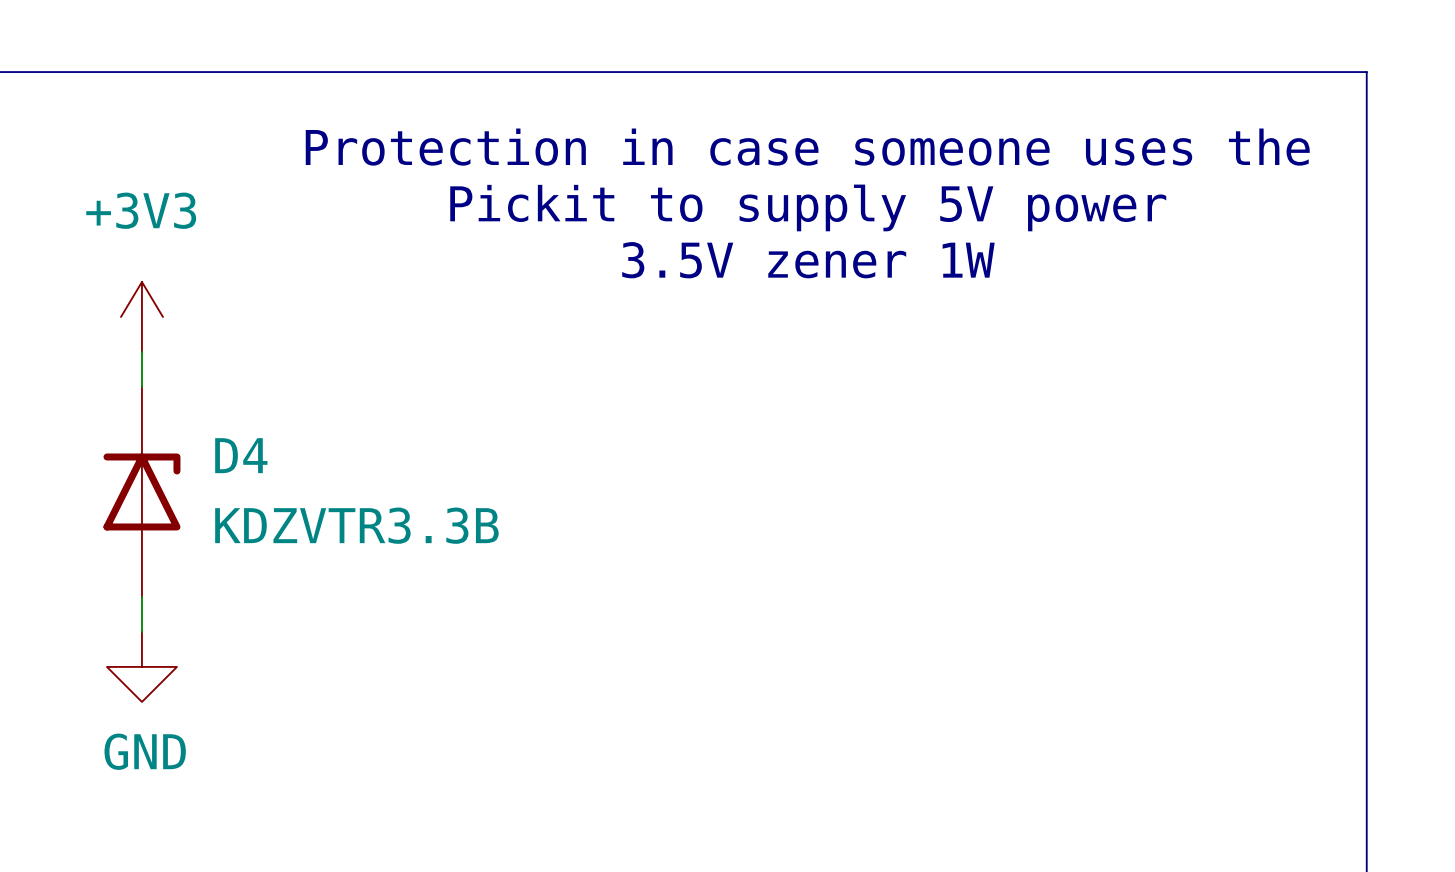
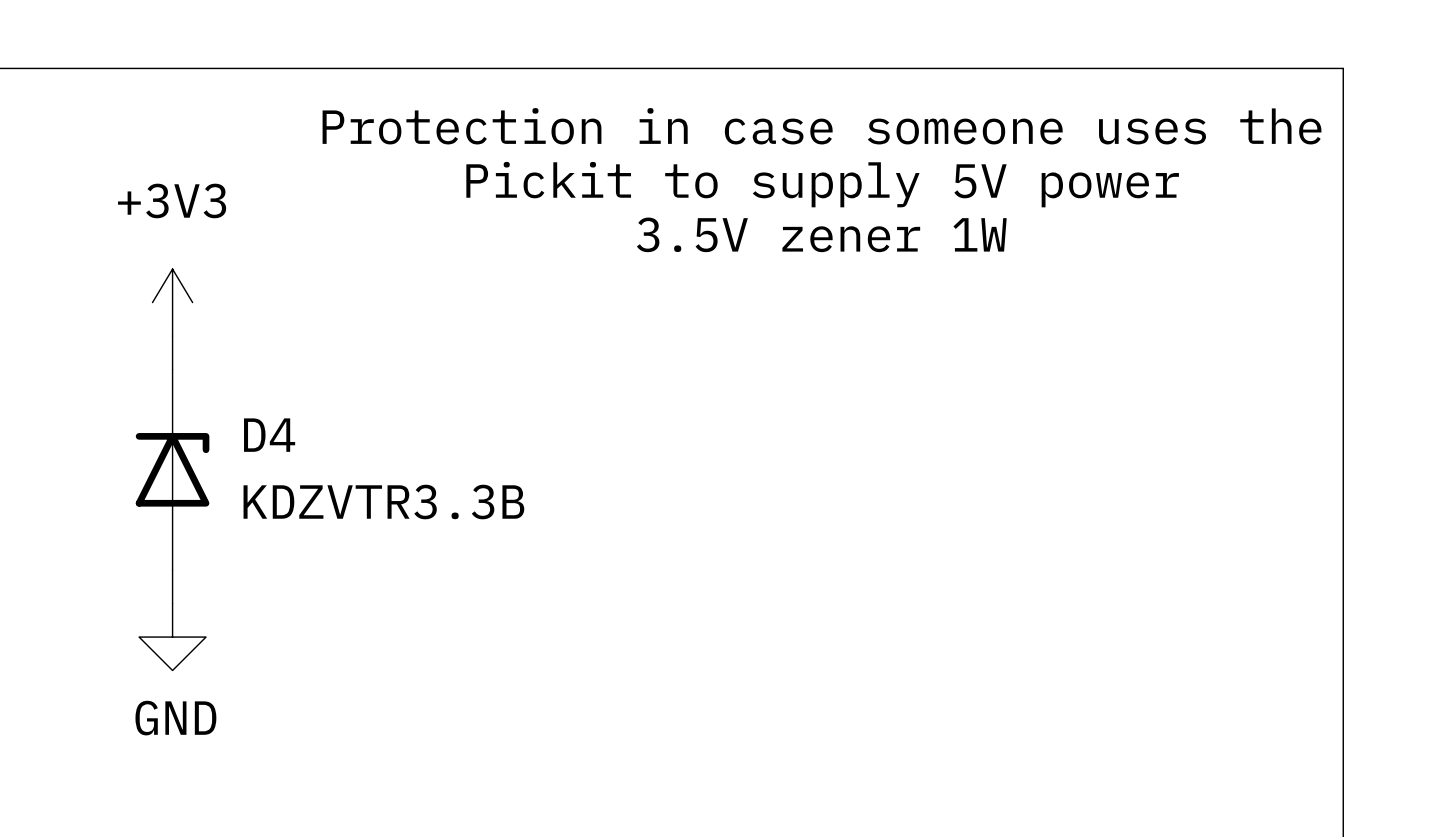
text position: Protection in case someone uses the (807, 147) -> Protection in case someone uses the (822, 126)
text position: Pickit to supply 5V power (808, 207) -> Pickit to supply 5V power (822, 184)
text position: 3.5V zener 1W (808, 260) -> 3.5V zener 1W (821, 234)

